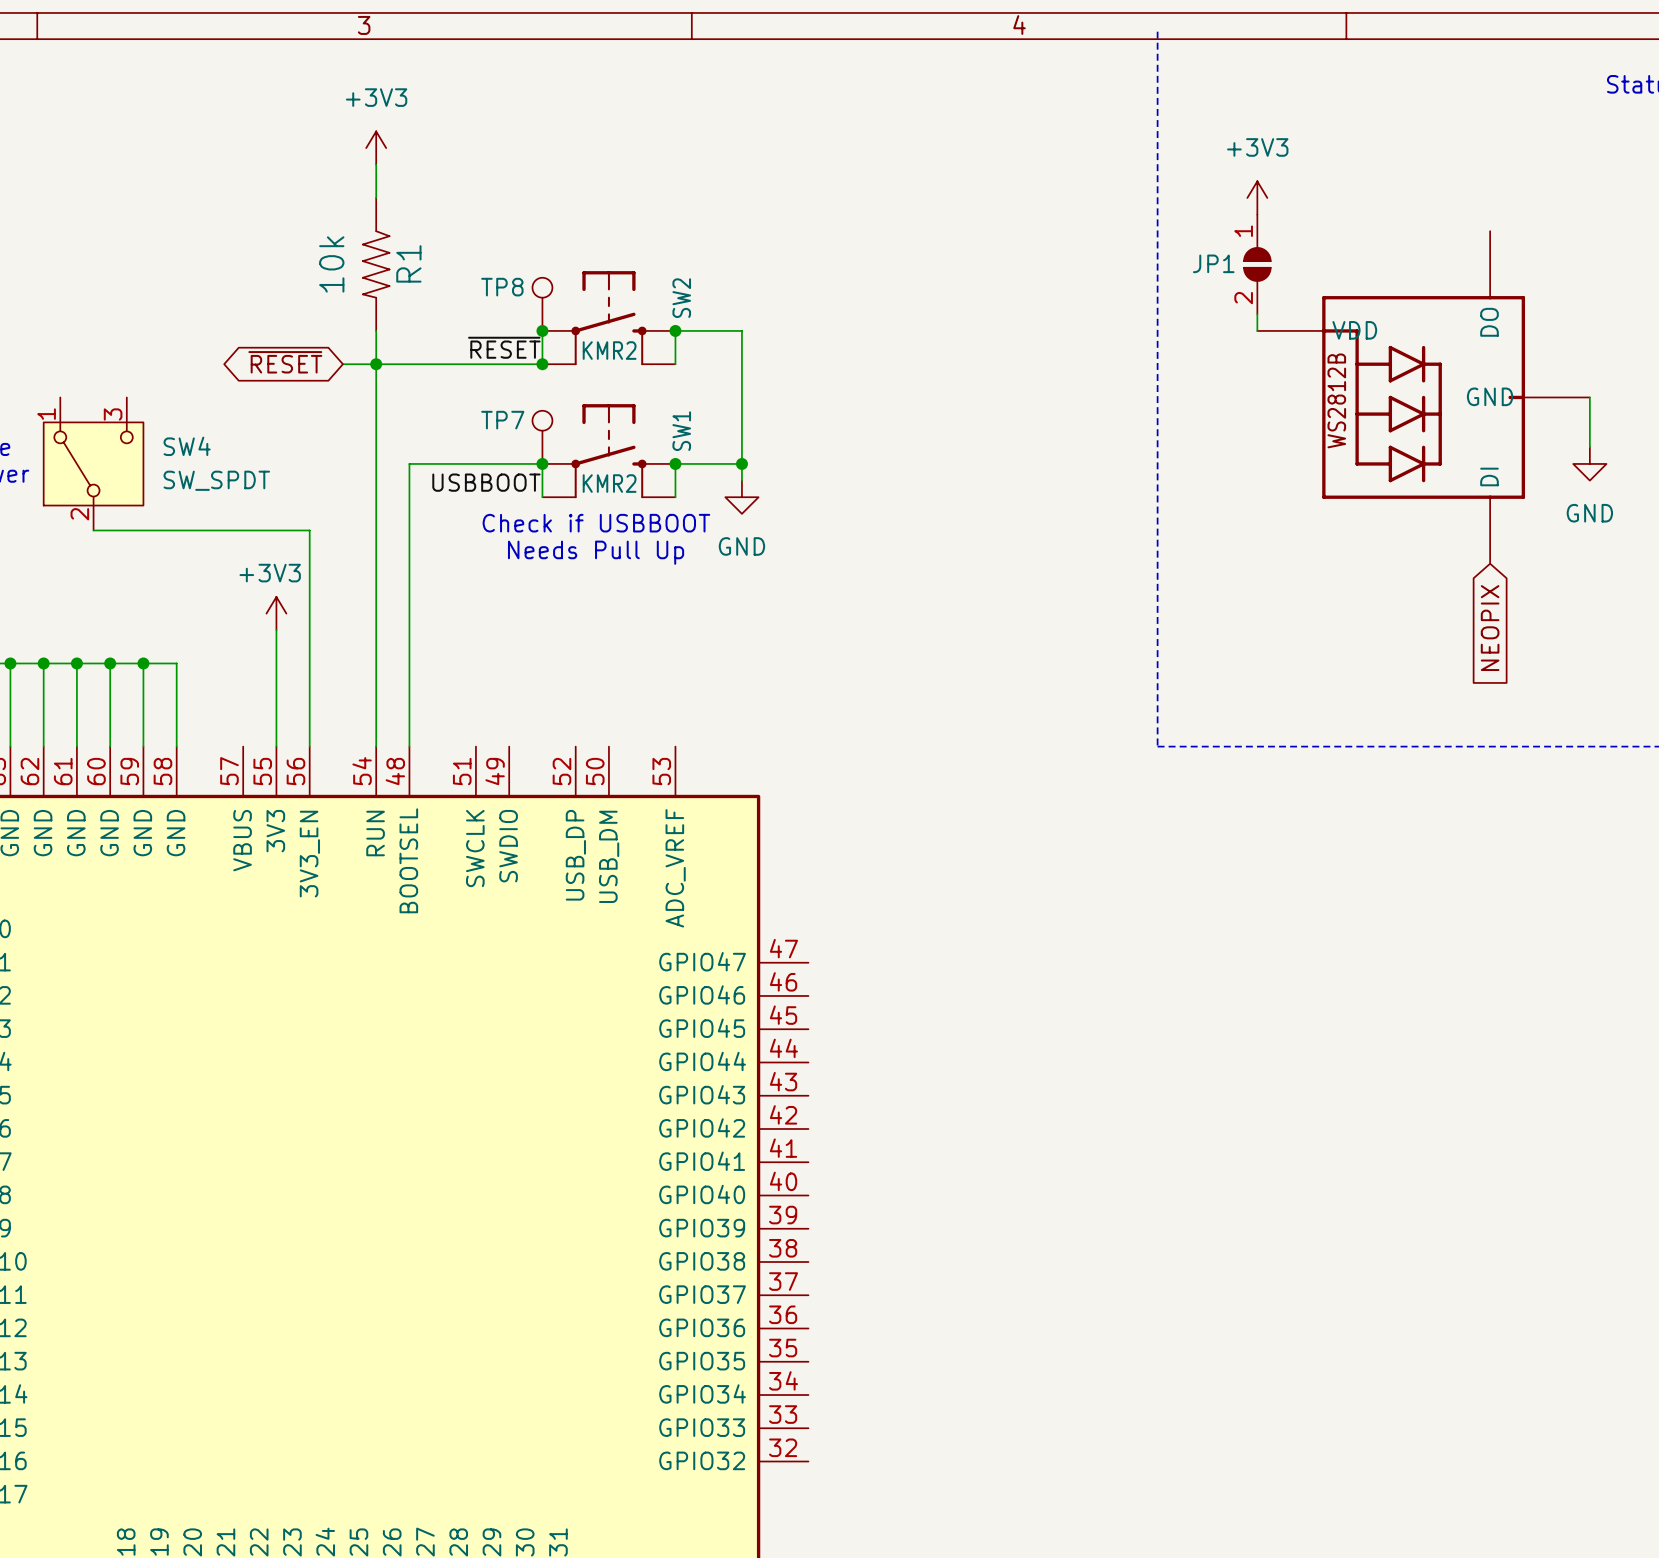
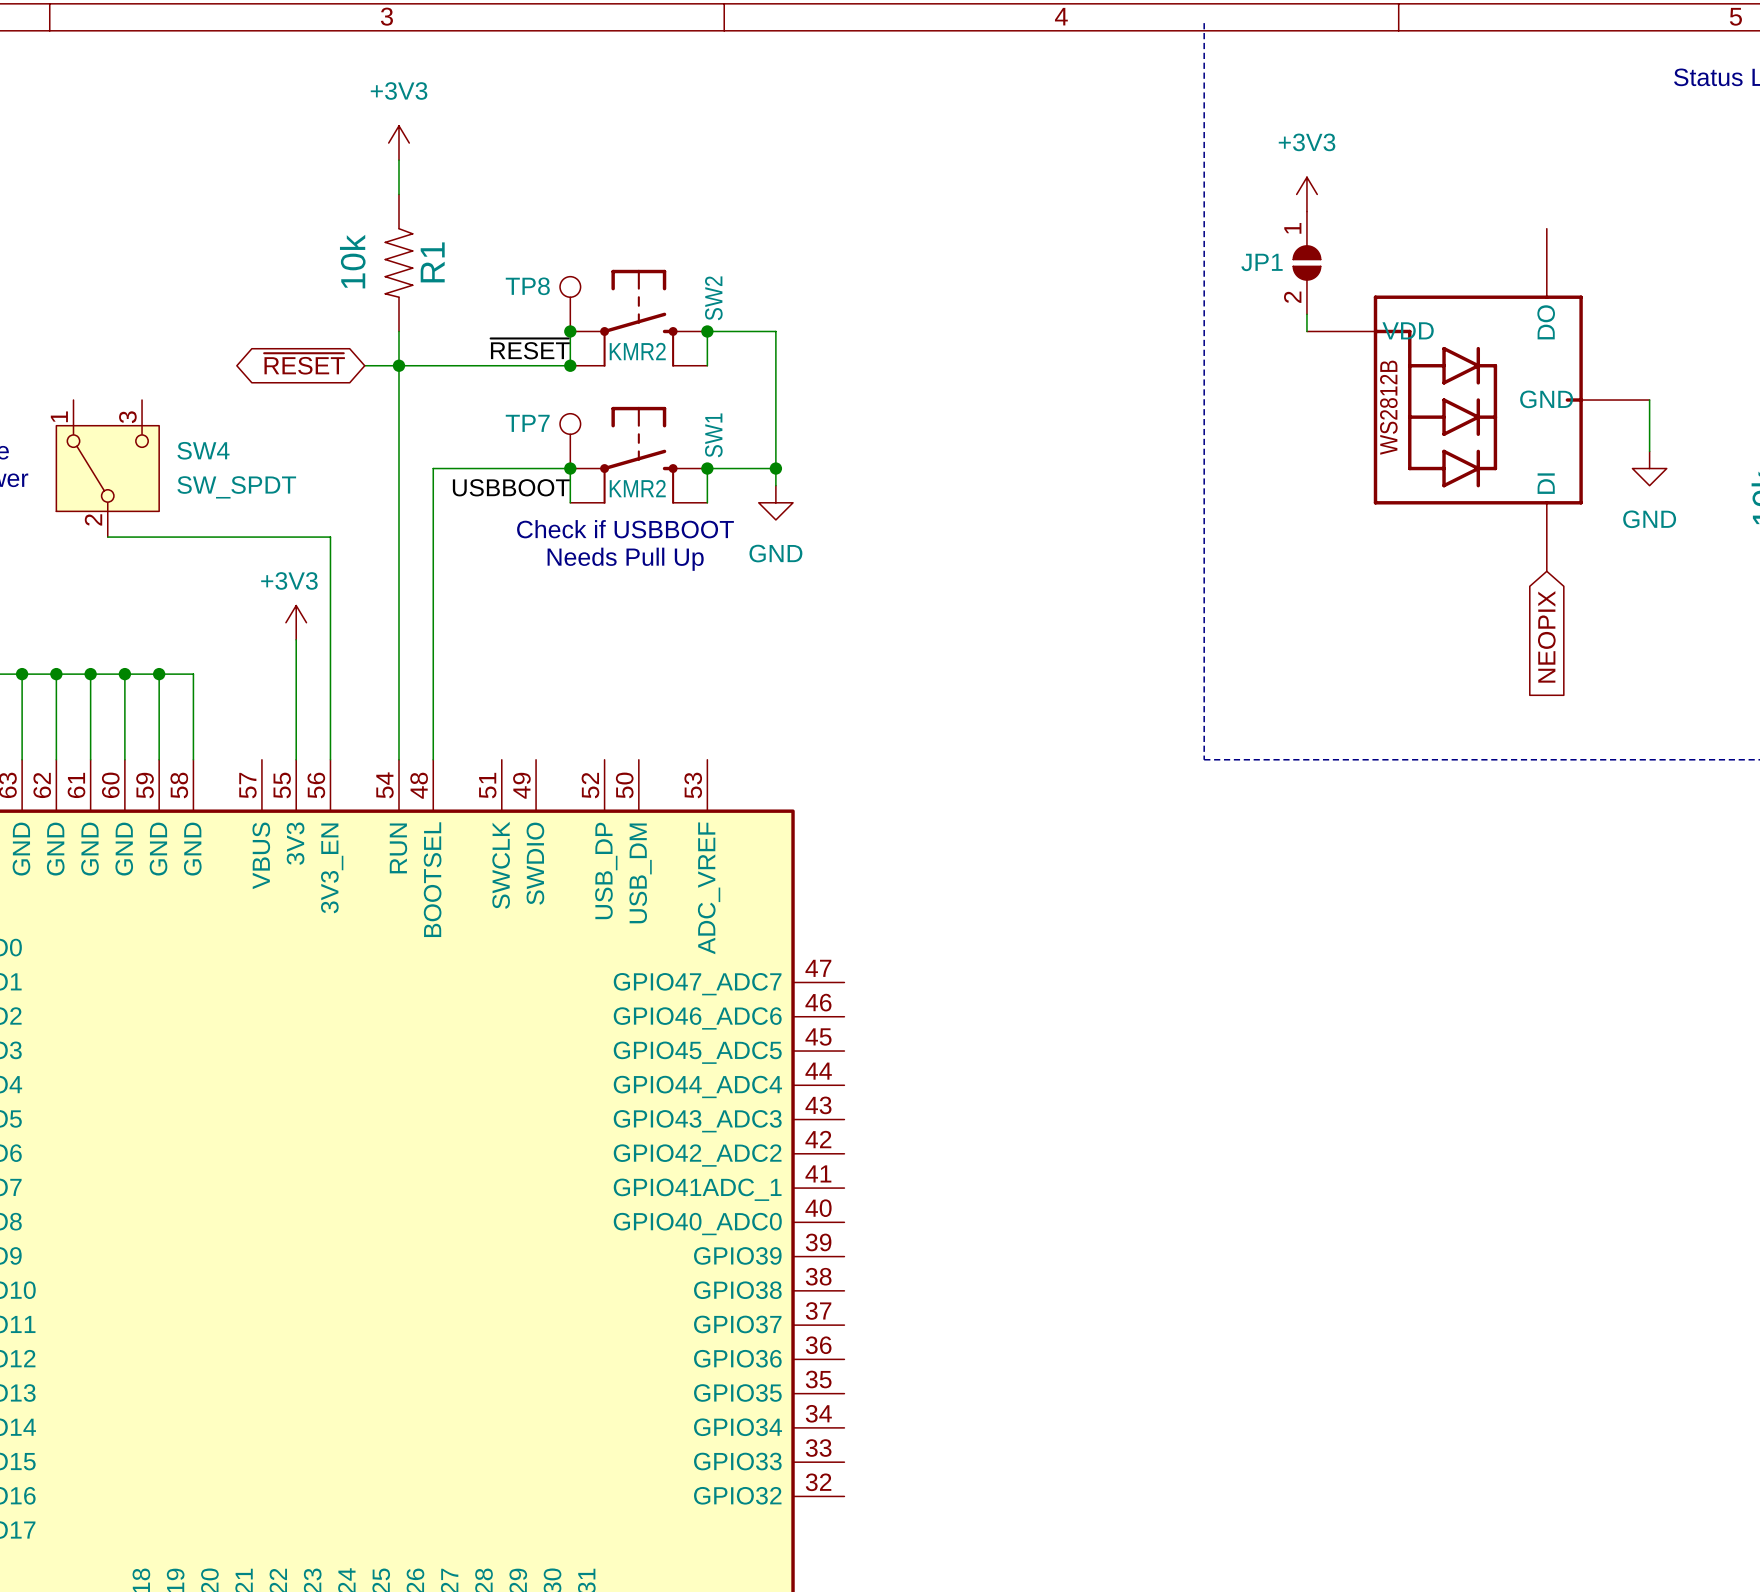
part pin name: GPIO47 (702, 961) -> GPIO47_ADC7 (697, 984)
part pin name: GPIO46 (702, 994) -> GPIO46_ADC6 (697, 1018)
part pin name: GPIO45 (702, 1028) -> GPIO45_ADC5 (697, 1052)
part pin name: GPIO44 (702, 1061) -> GPIO44_ADC4 (697, 1086)
part pin name: GPIO43 (702, 1094) -> GPIO43_ADC3 (697, 1121)
part pin name: GPIO42 (702, 1127) -> GPIO42_ADC2 (697, 1155)
part pin name: GPIO41 (702, 1161) -> GPIO41ADC_1 (697, 1189)
part pin name: GPIO40 (702, 1194) -> GPIO40_ADC0 (697, 1224)

